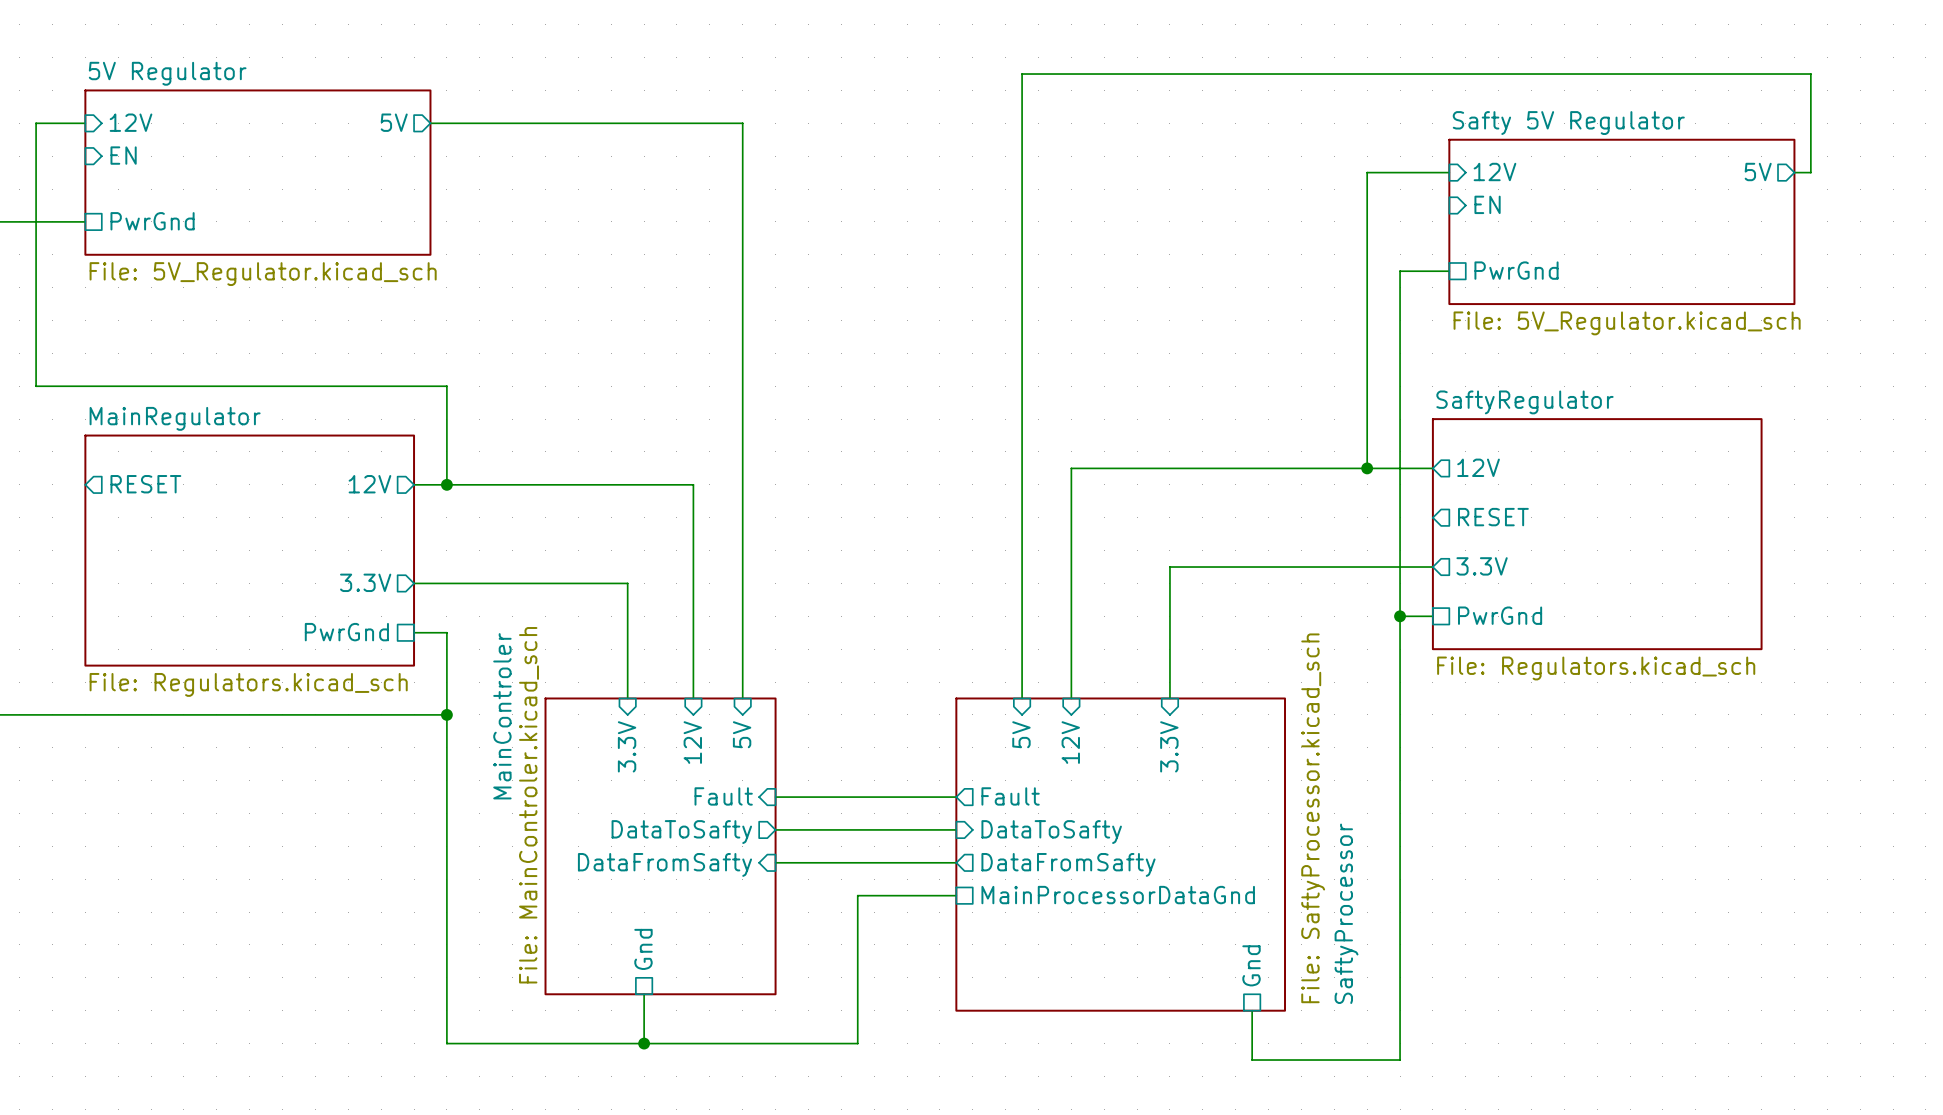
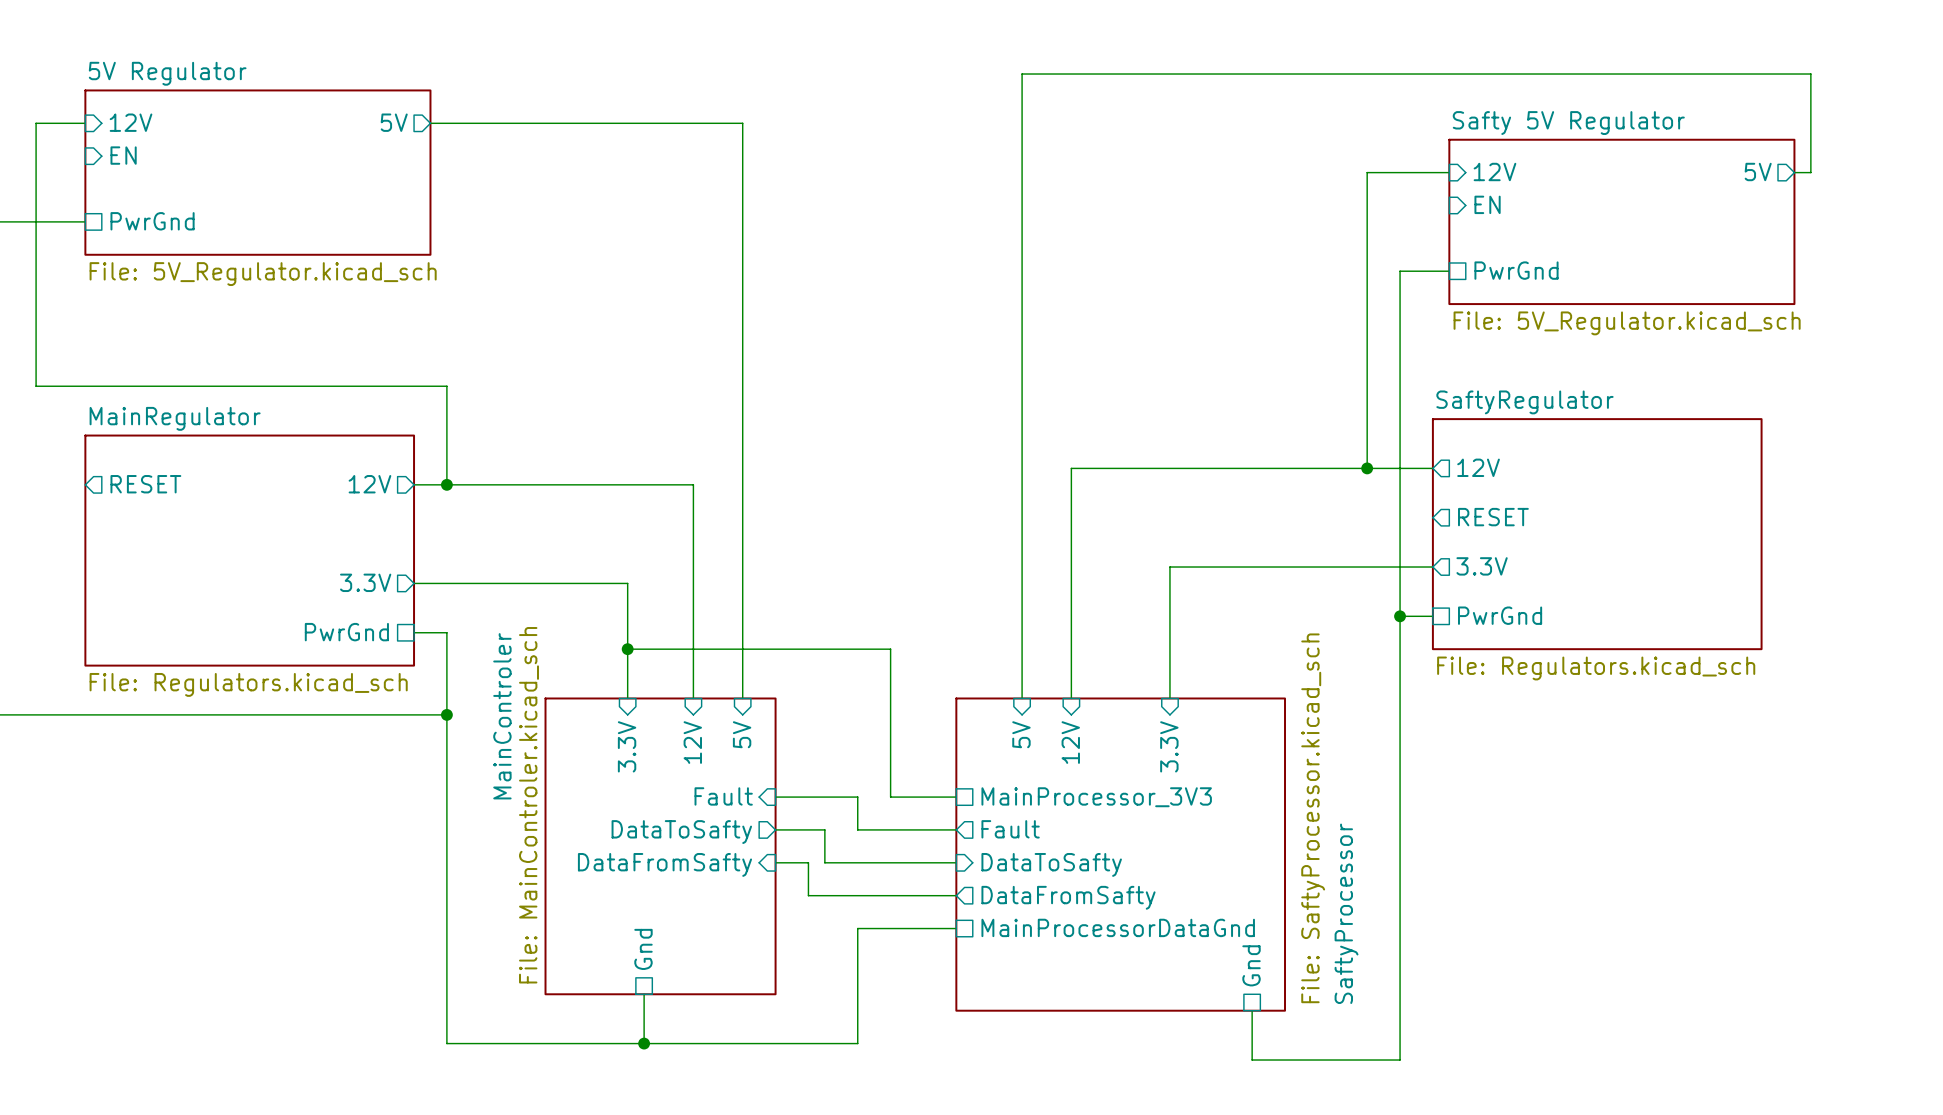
wire: none -> (627, 649) (890, 649) (890, 797)
junction: none -> (627, 649)
sheet pin shape: output (1010, 796) -> passive (1096, 797)
sheet pin: Fault (1010, 796) -> MainProcessor_3V3 (1096, 797)
wire: (857, 797) (890, 797) -> (857, 797) (857, 829)
wire: (824, 829) (857, 829) -> none
sheet pin shape: input (1051, 832) -> output (1010, 829)
sheet pin: DataToSafty (1051, 832) -> Fault (1010, 829)
wire: (808, 862) (824, 862) -> (824, 829) (824, 862)
sheet pin shape: output (1068, 864) -> input (1051, 864)
sheet pin: DataFromSafty (1068, 864) -> DataToSafty (1051, 864)
wire: (857, 895) (857, 928) -> (857, 895) (808, 895) (808, 862)
sheet pin shape: passive (1118, 895) -> output (1068, 897)
sheet pin: MainProcessorDataGnd (1118, 895) -> DataFromSafty (1068, 897)
sheet pin: none -> MainProcessorDataGnd (1118, 927)
wire: none -> (857, 928) (956, 928)

